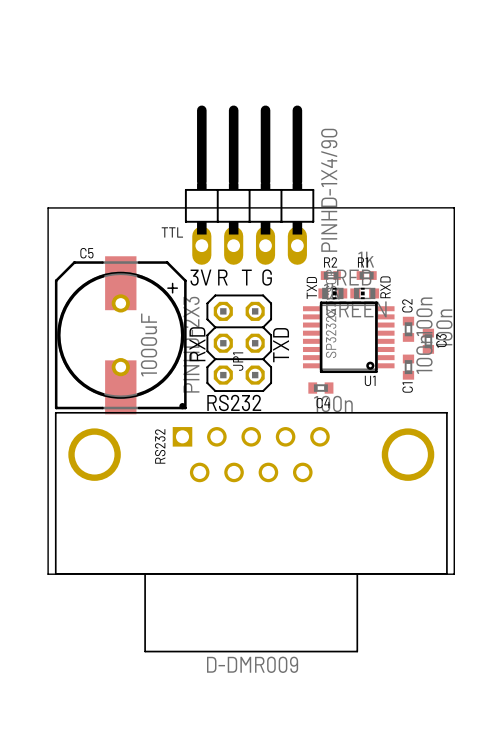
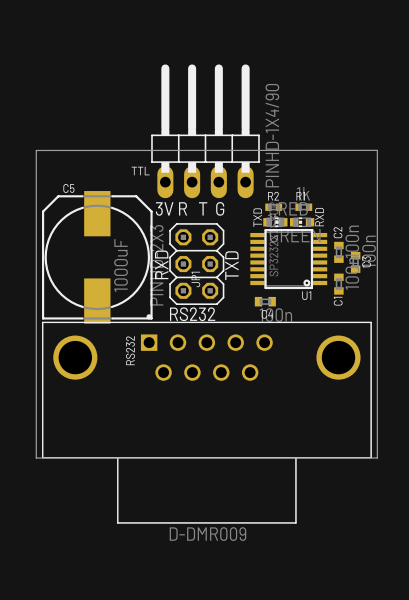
part: (120, 335) -> none

